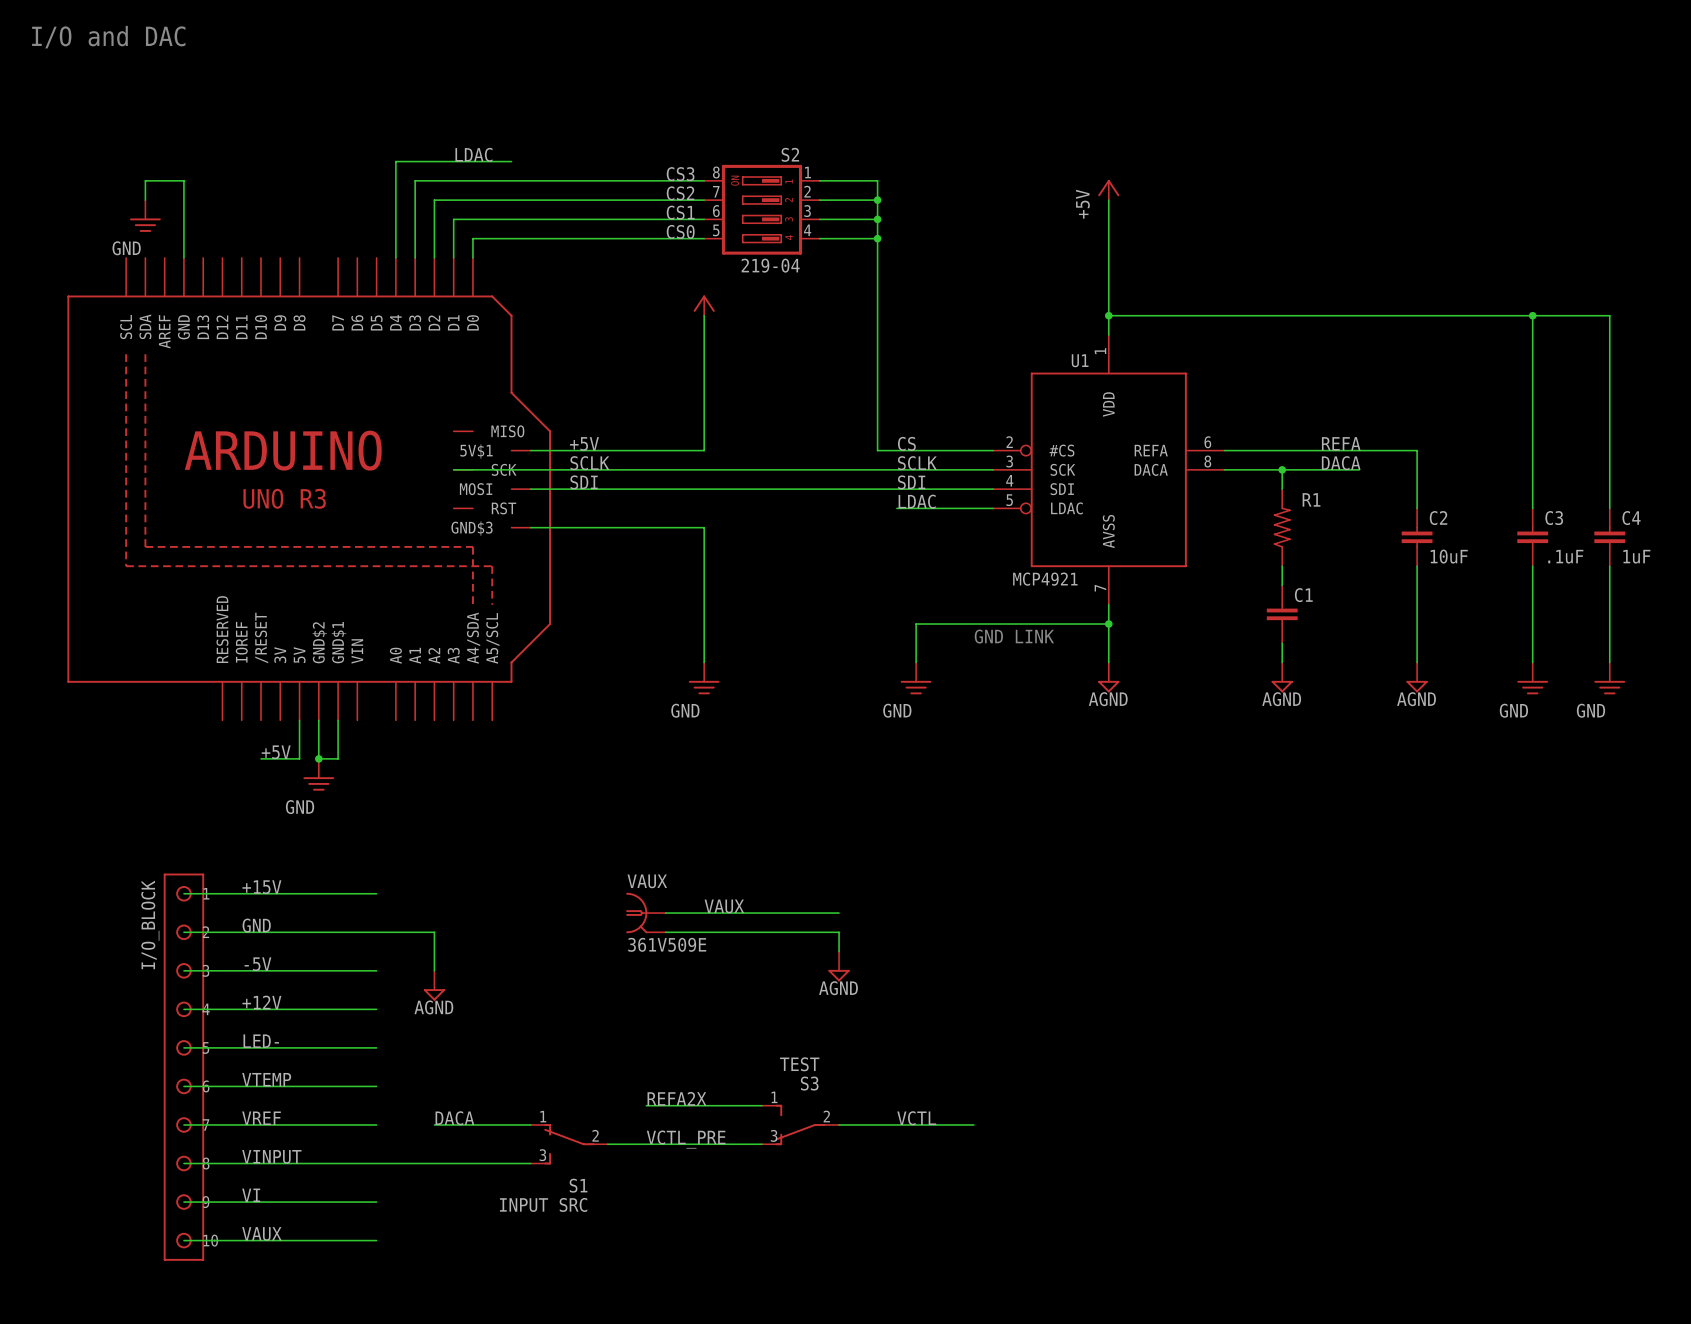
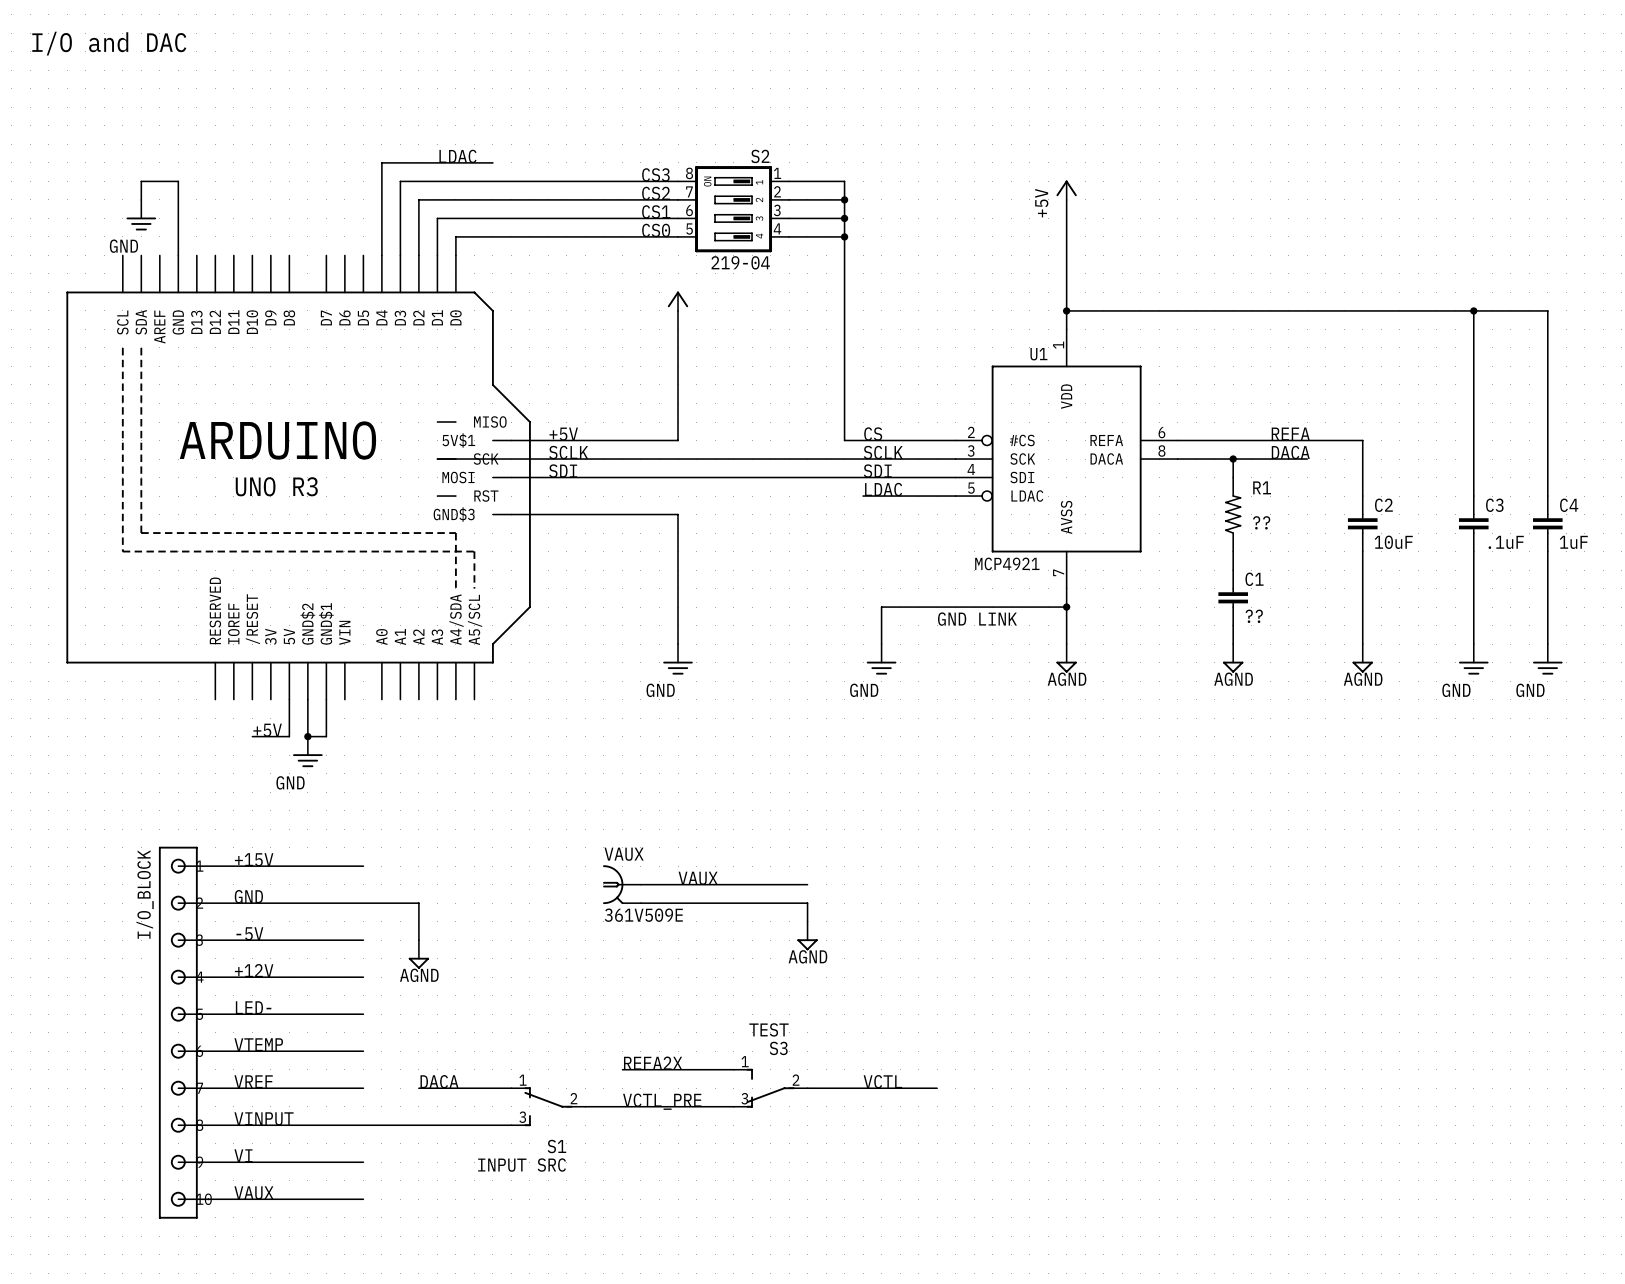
R1 value: none -> ?? (1261, 522)
C1 value: none -> ?? (1254, 616)

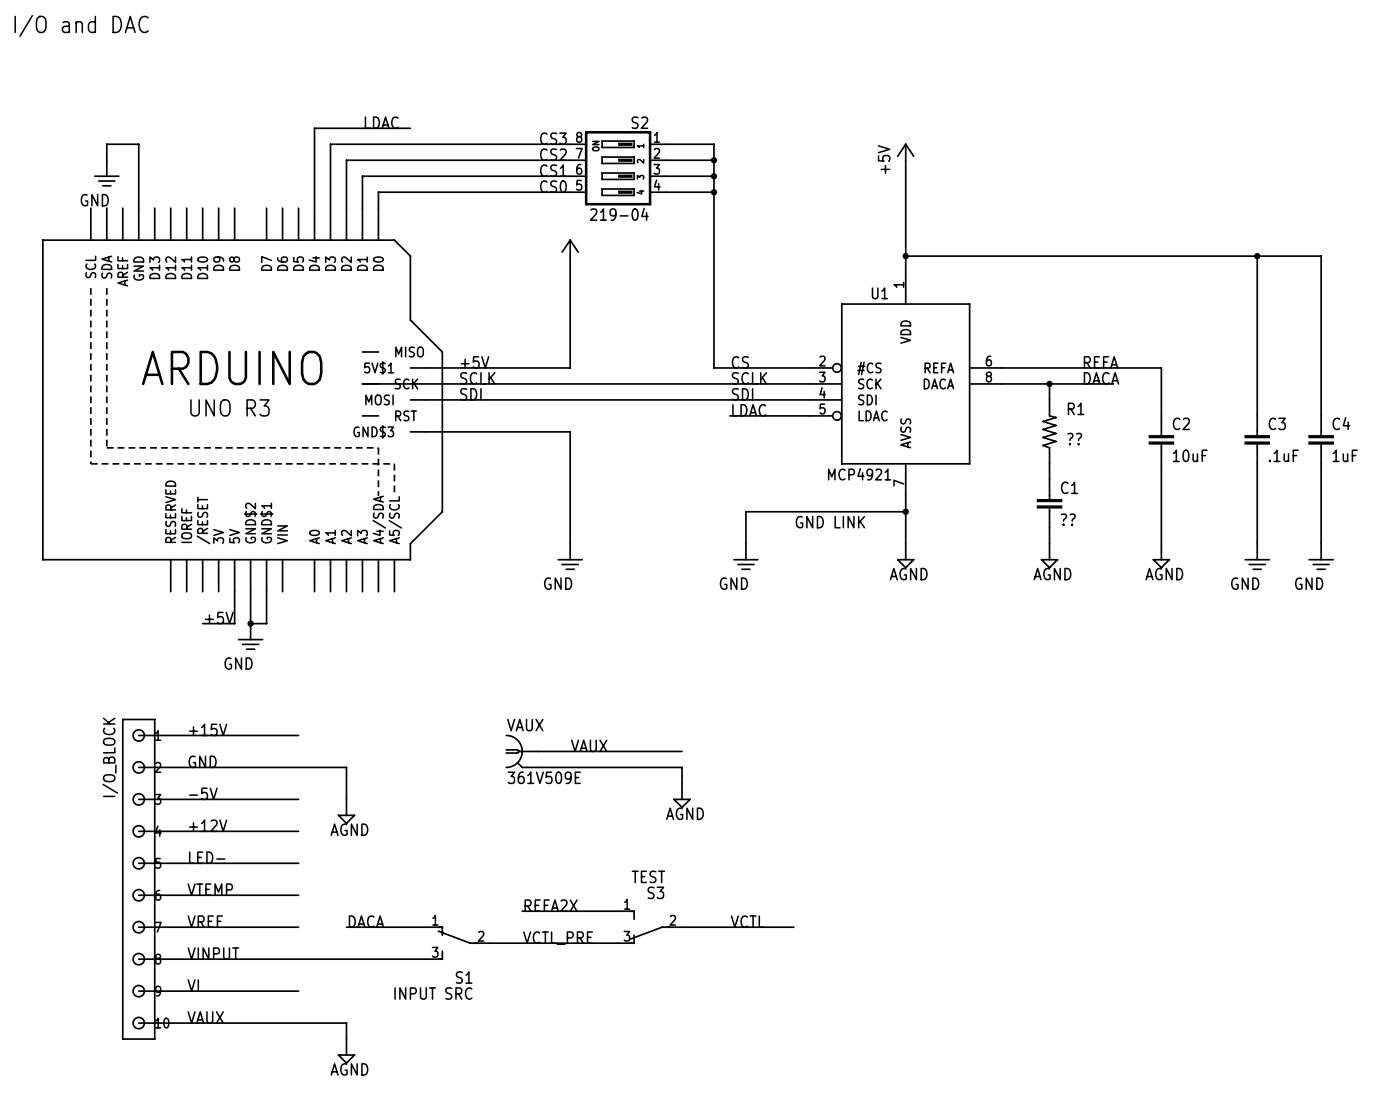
wire: none -> (298, 1023) (346, 1023) (346, 1039)
power symbol: none -> AGND (346, 1051)

